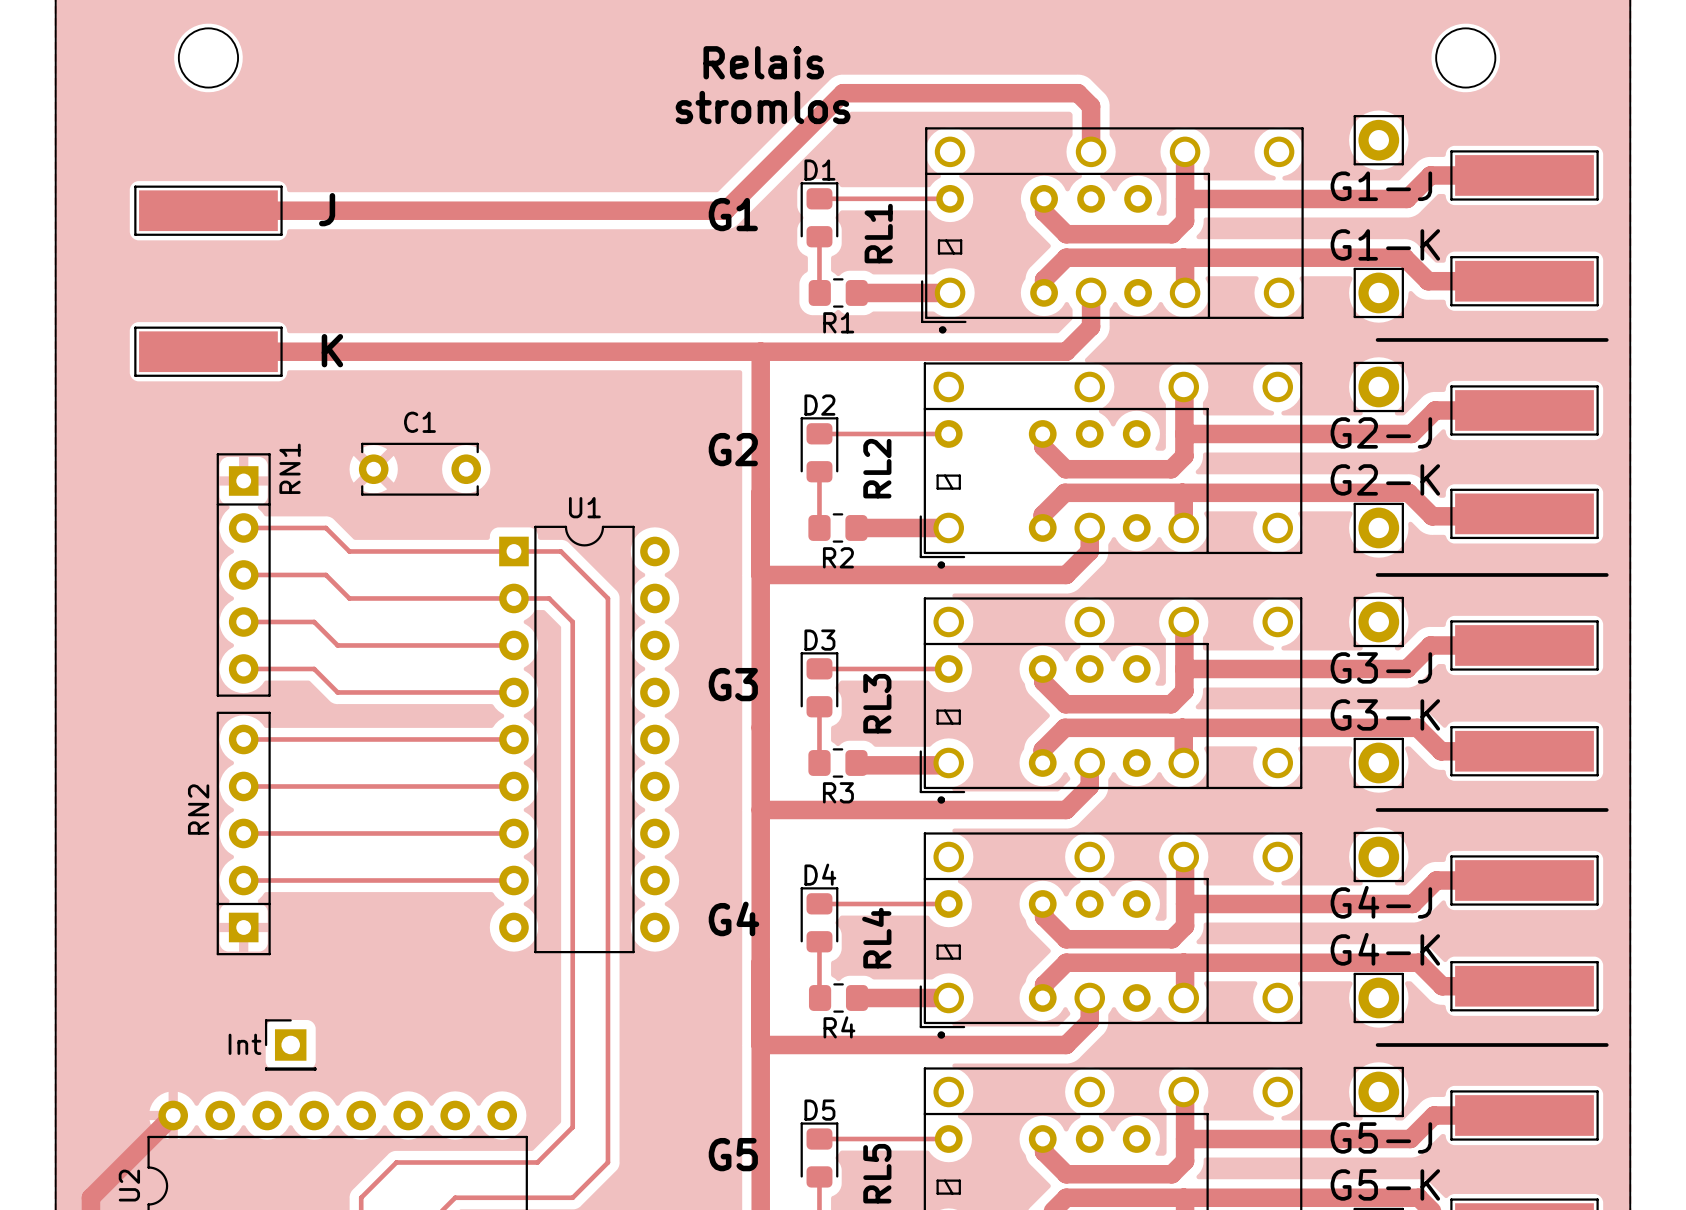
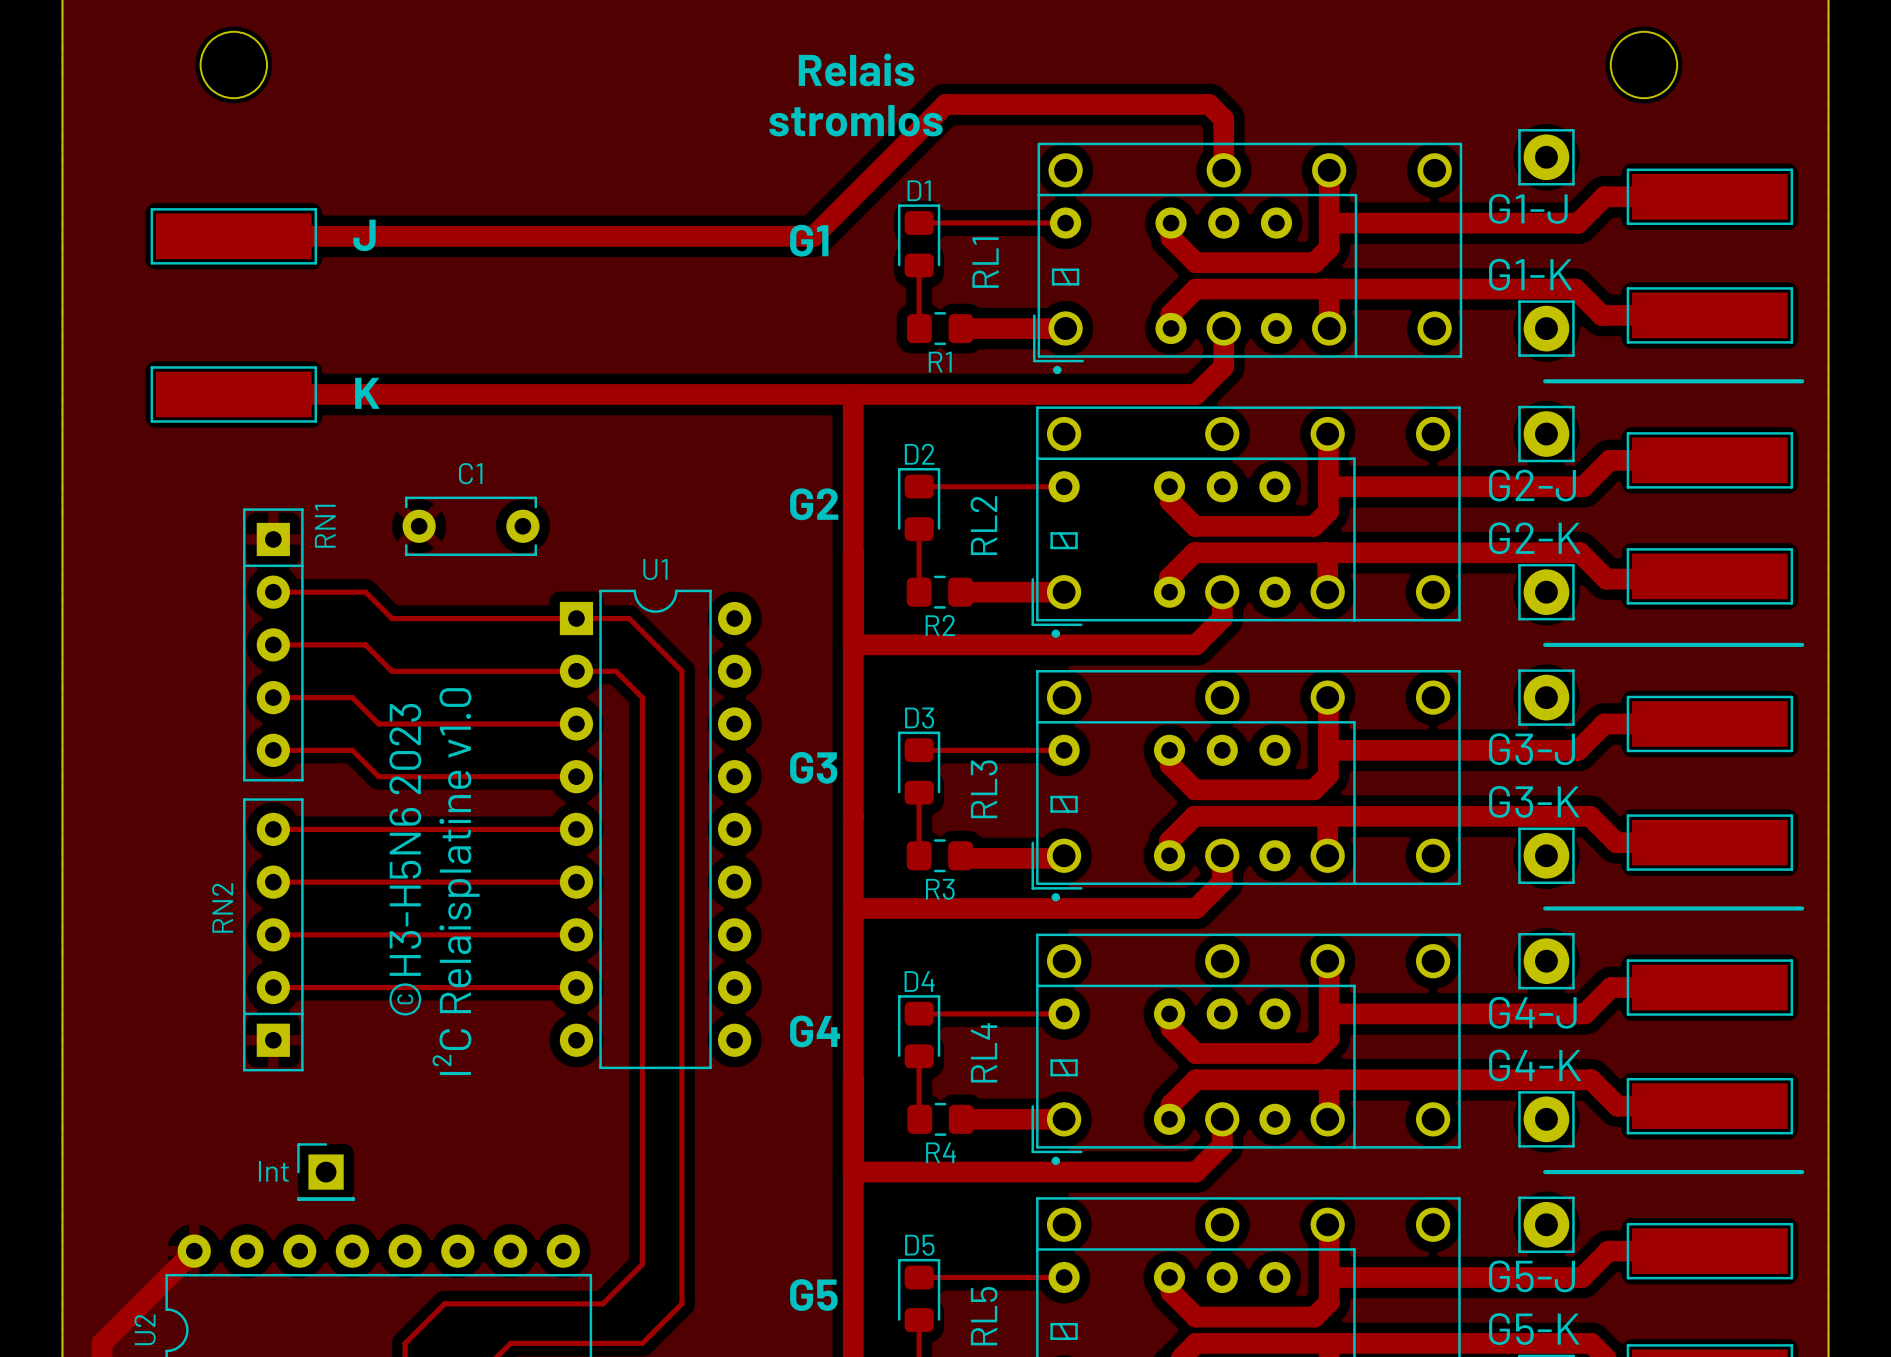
text: none -> ©H3-H5N6 2023 (405, 859)
text: none -> I²C Relaisplatine v1.0 (456, 881)

